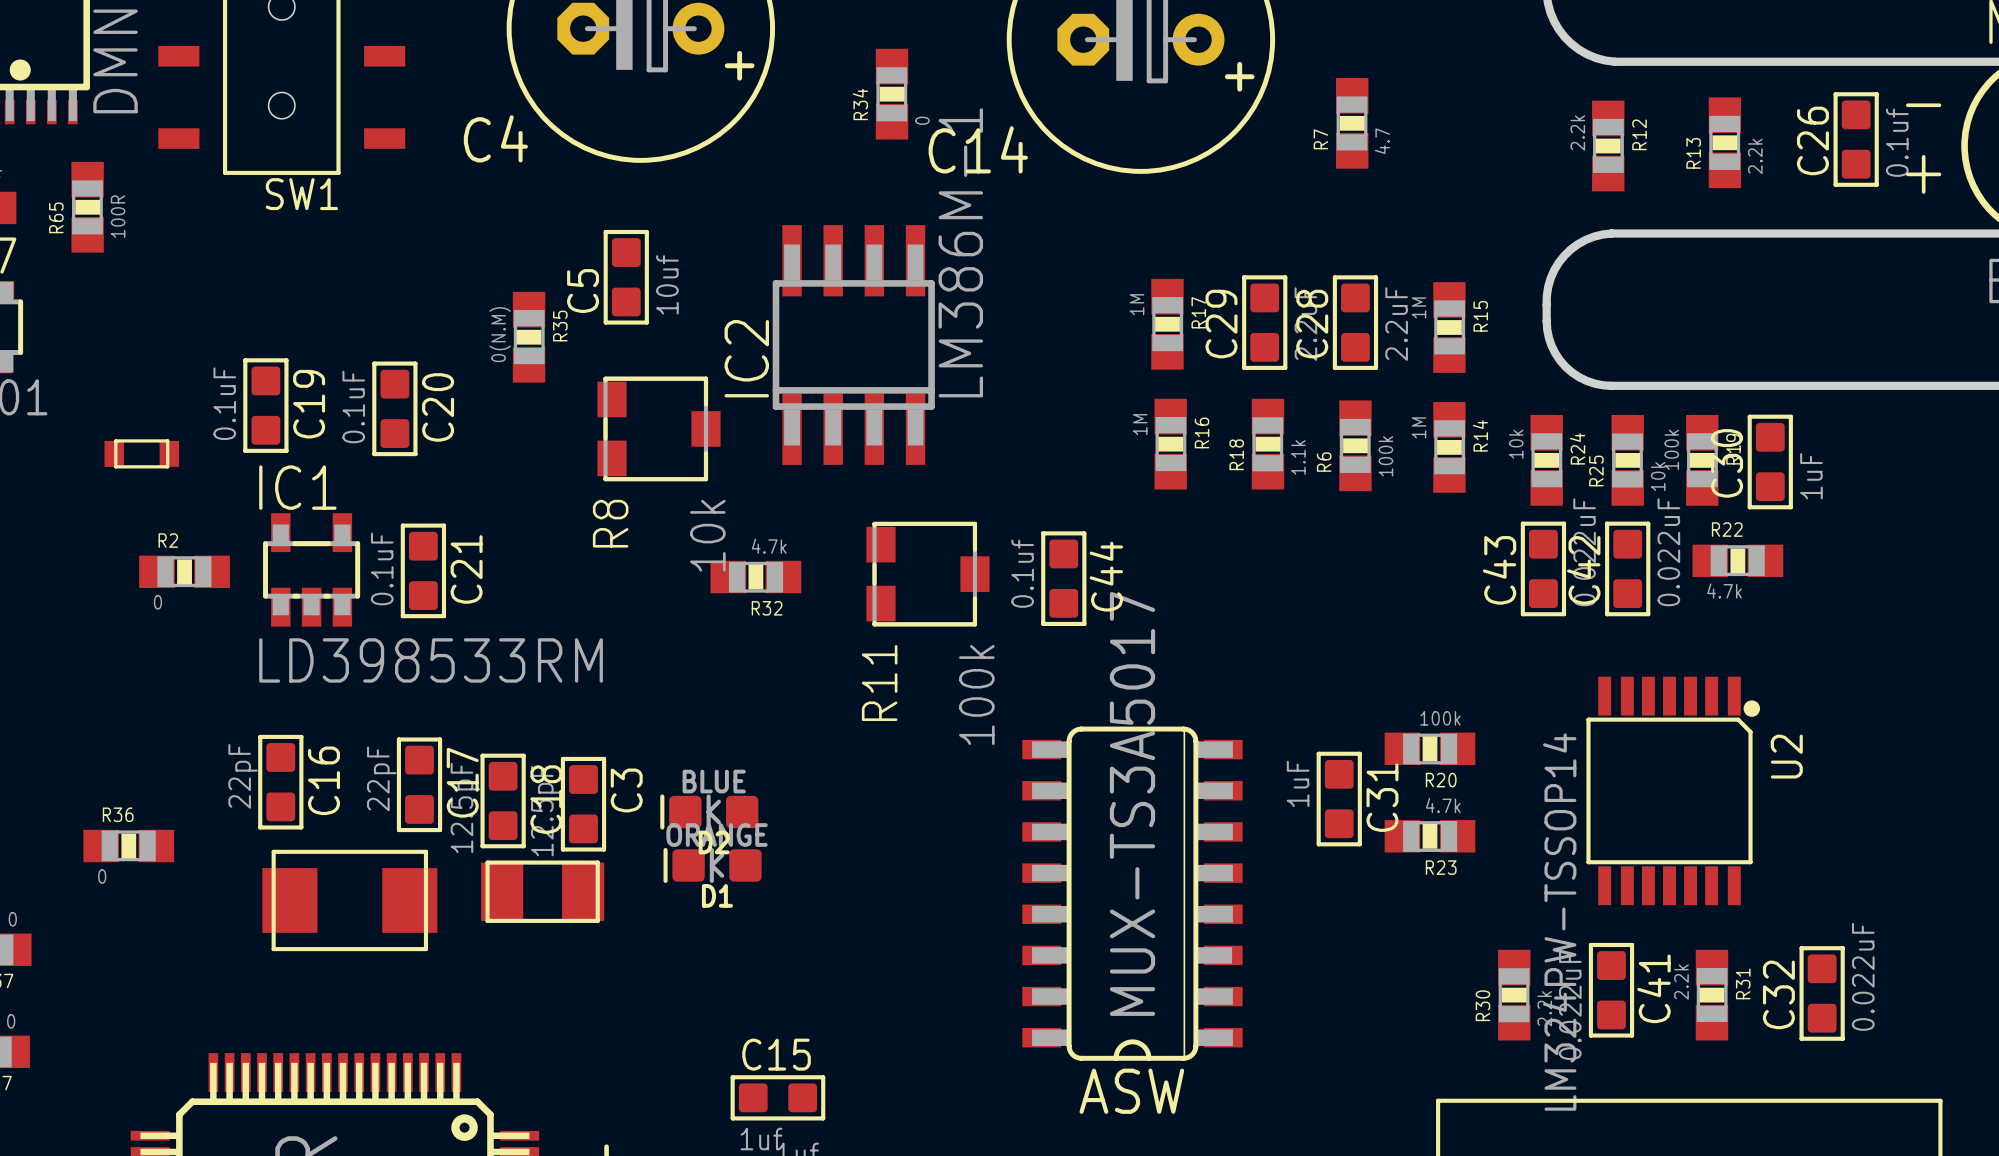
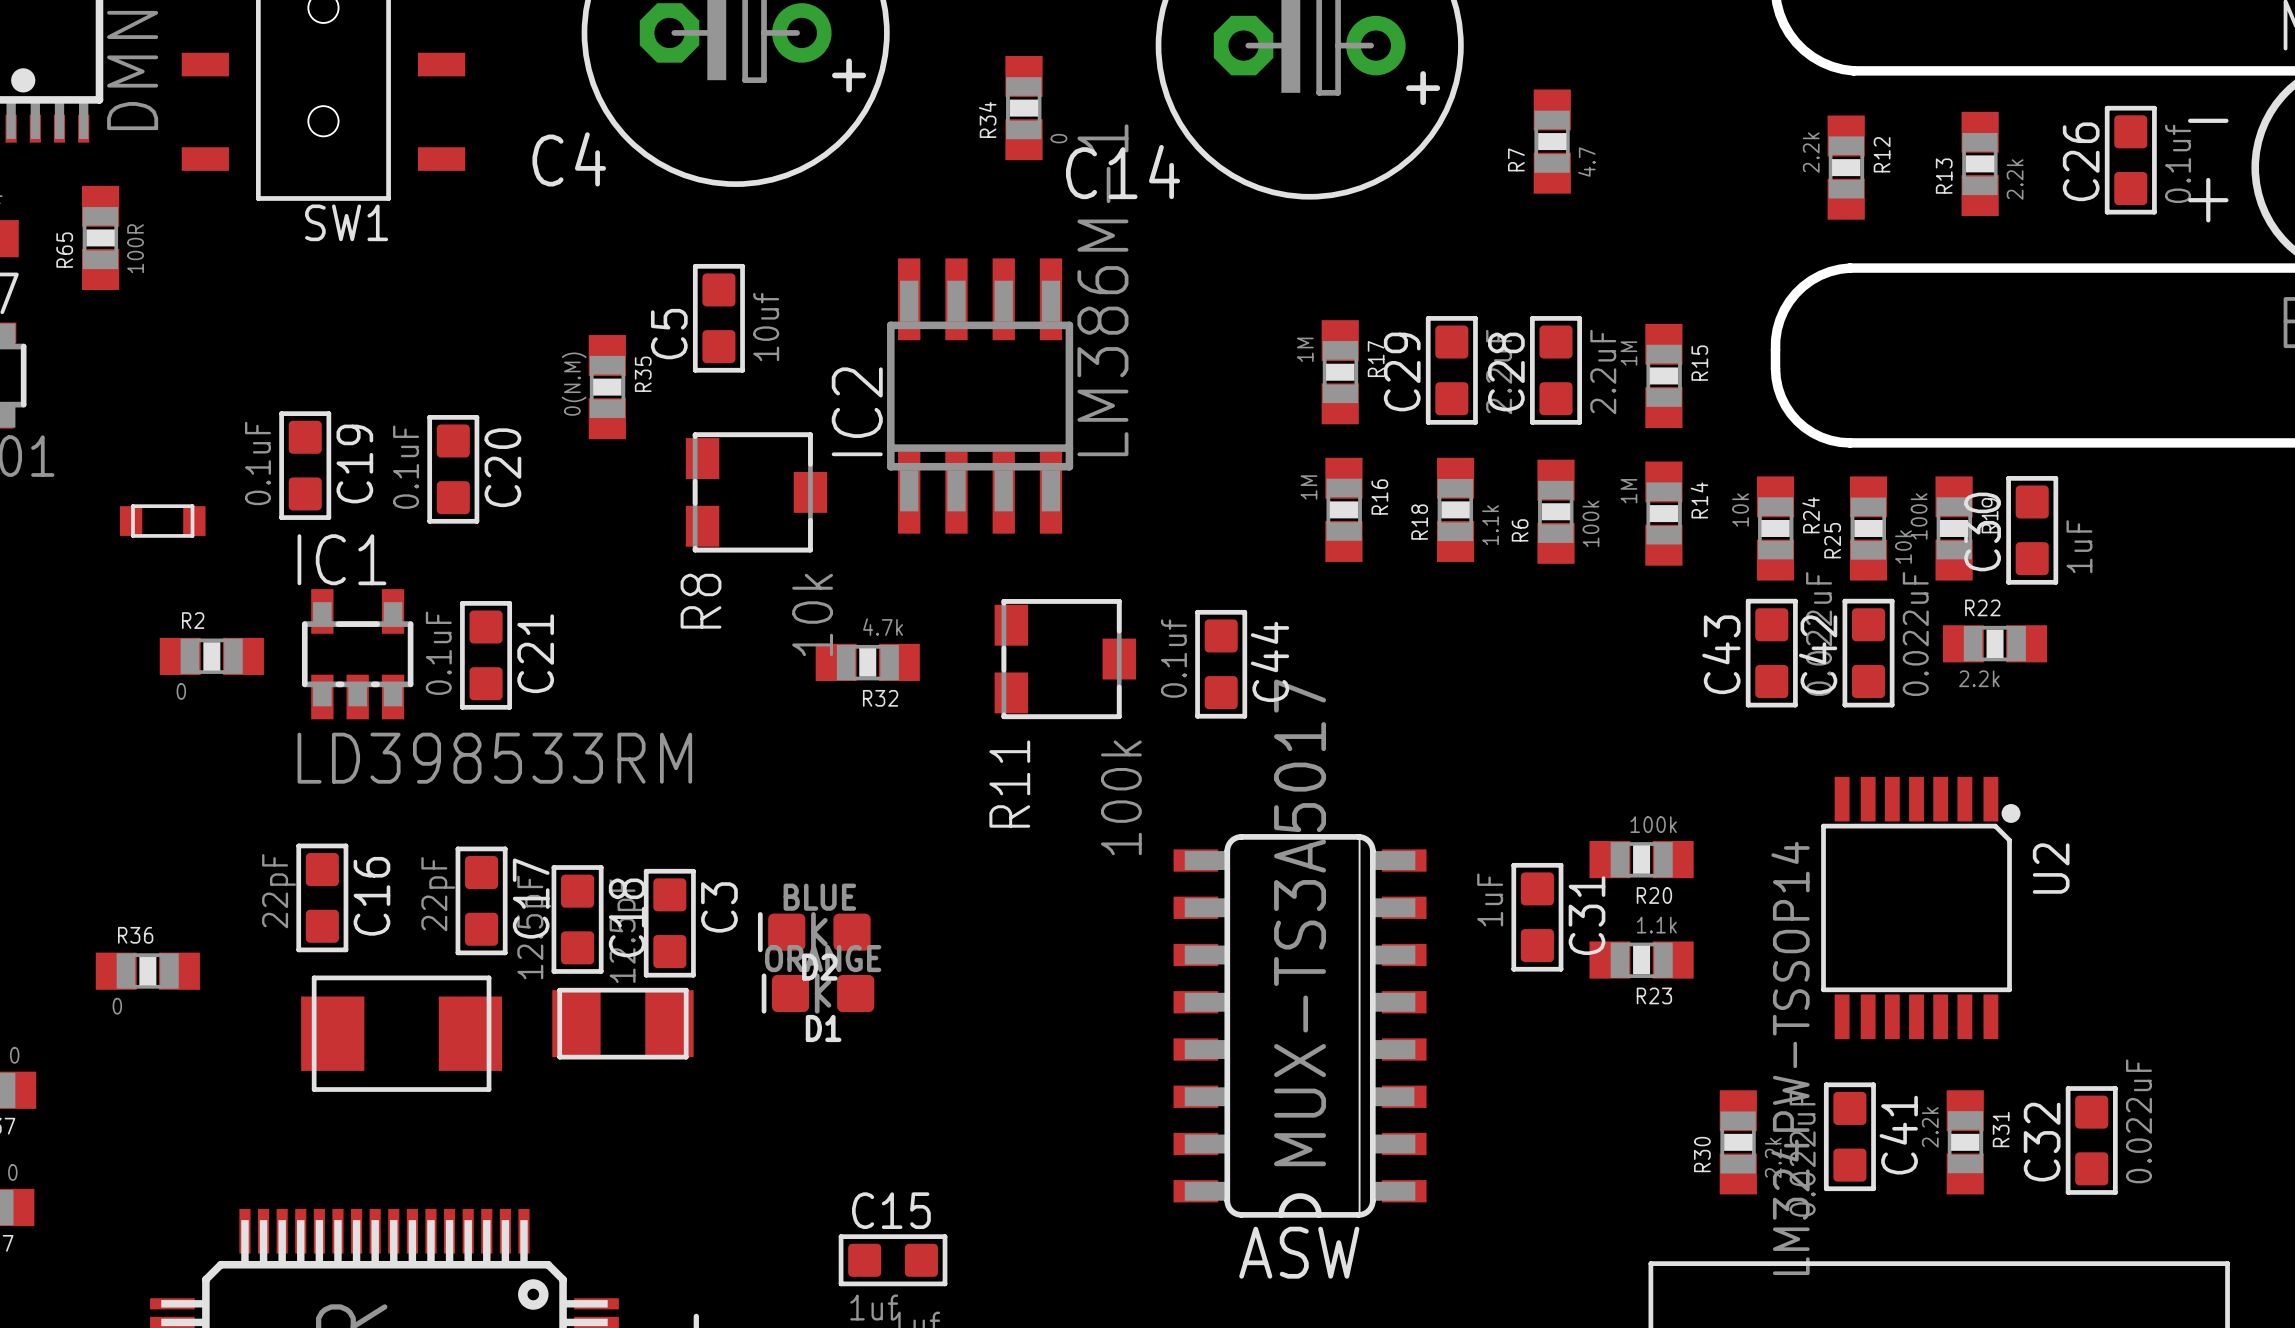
R22 value: 4.7k (1724, 590) -> 2.2k (1979, 678)
R23 value: 4.7k (1443, 805) -> 1.1k (1656, 925)

